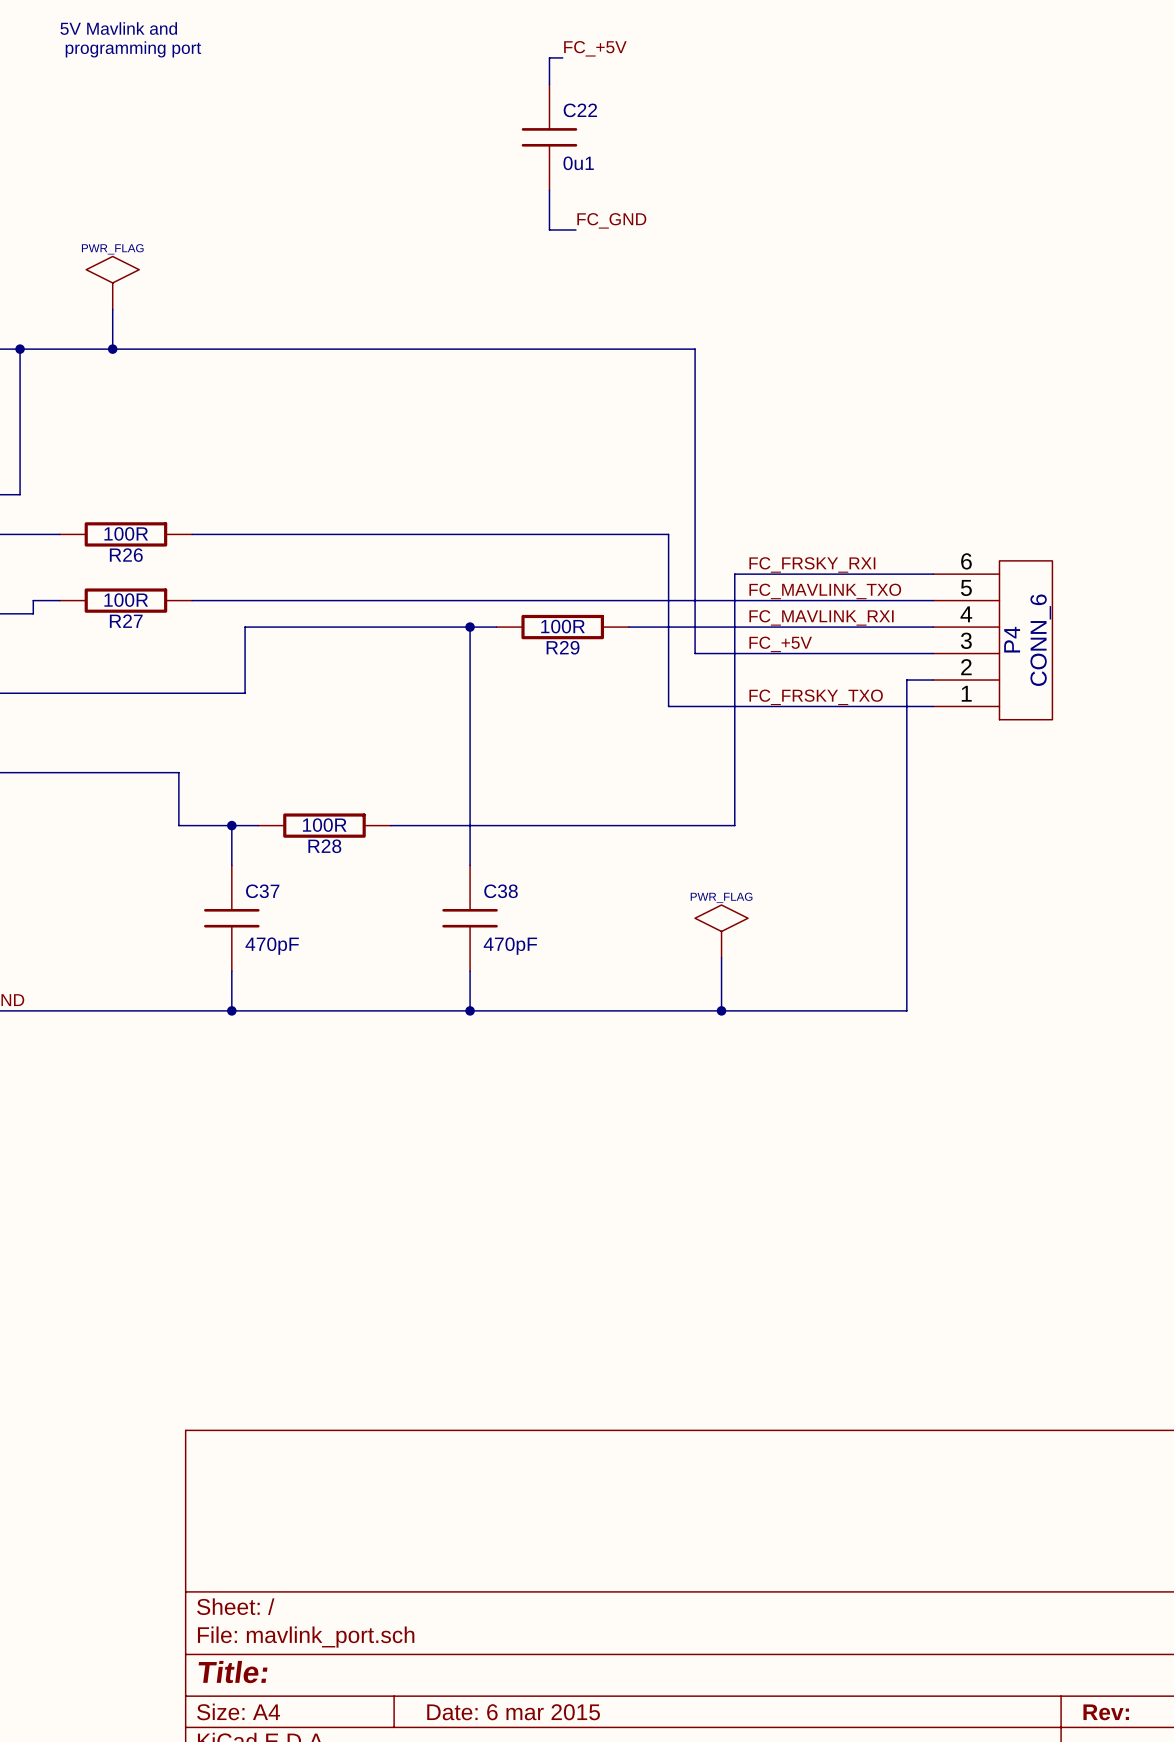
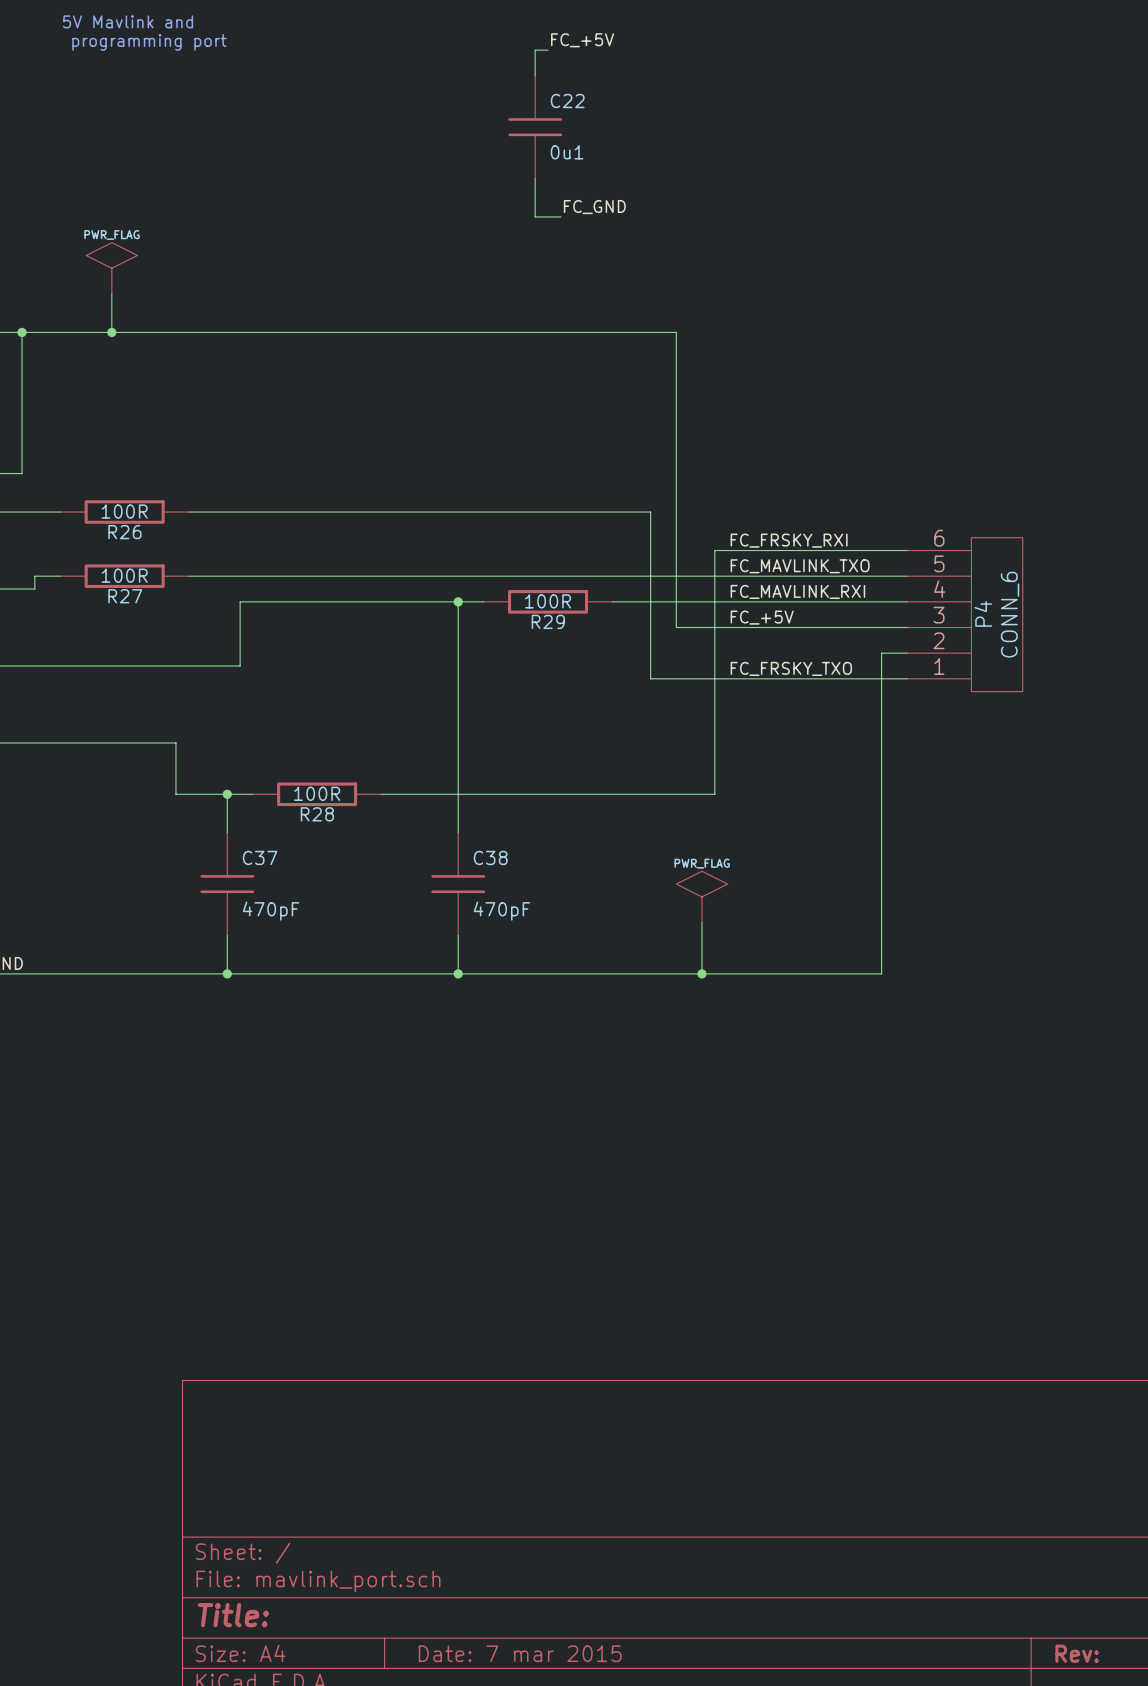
title block: Date: 6 mar 2015 (513, 1712) -> Date: 7 mar 2015 (520, 1653)

